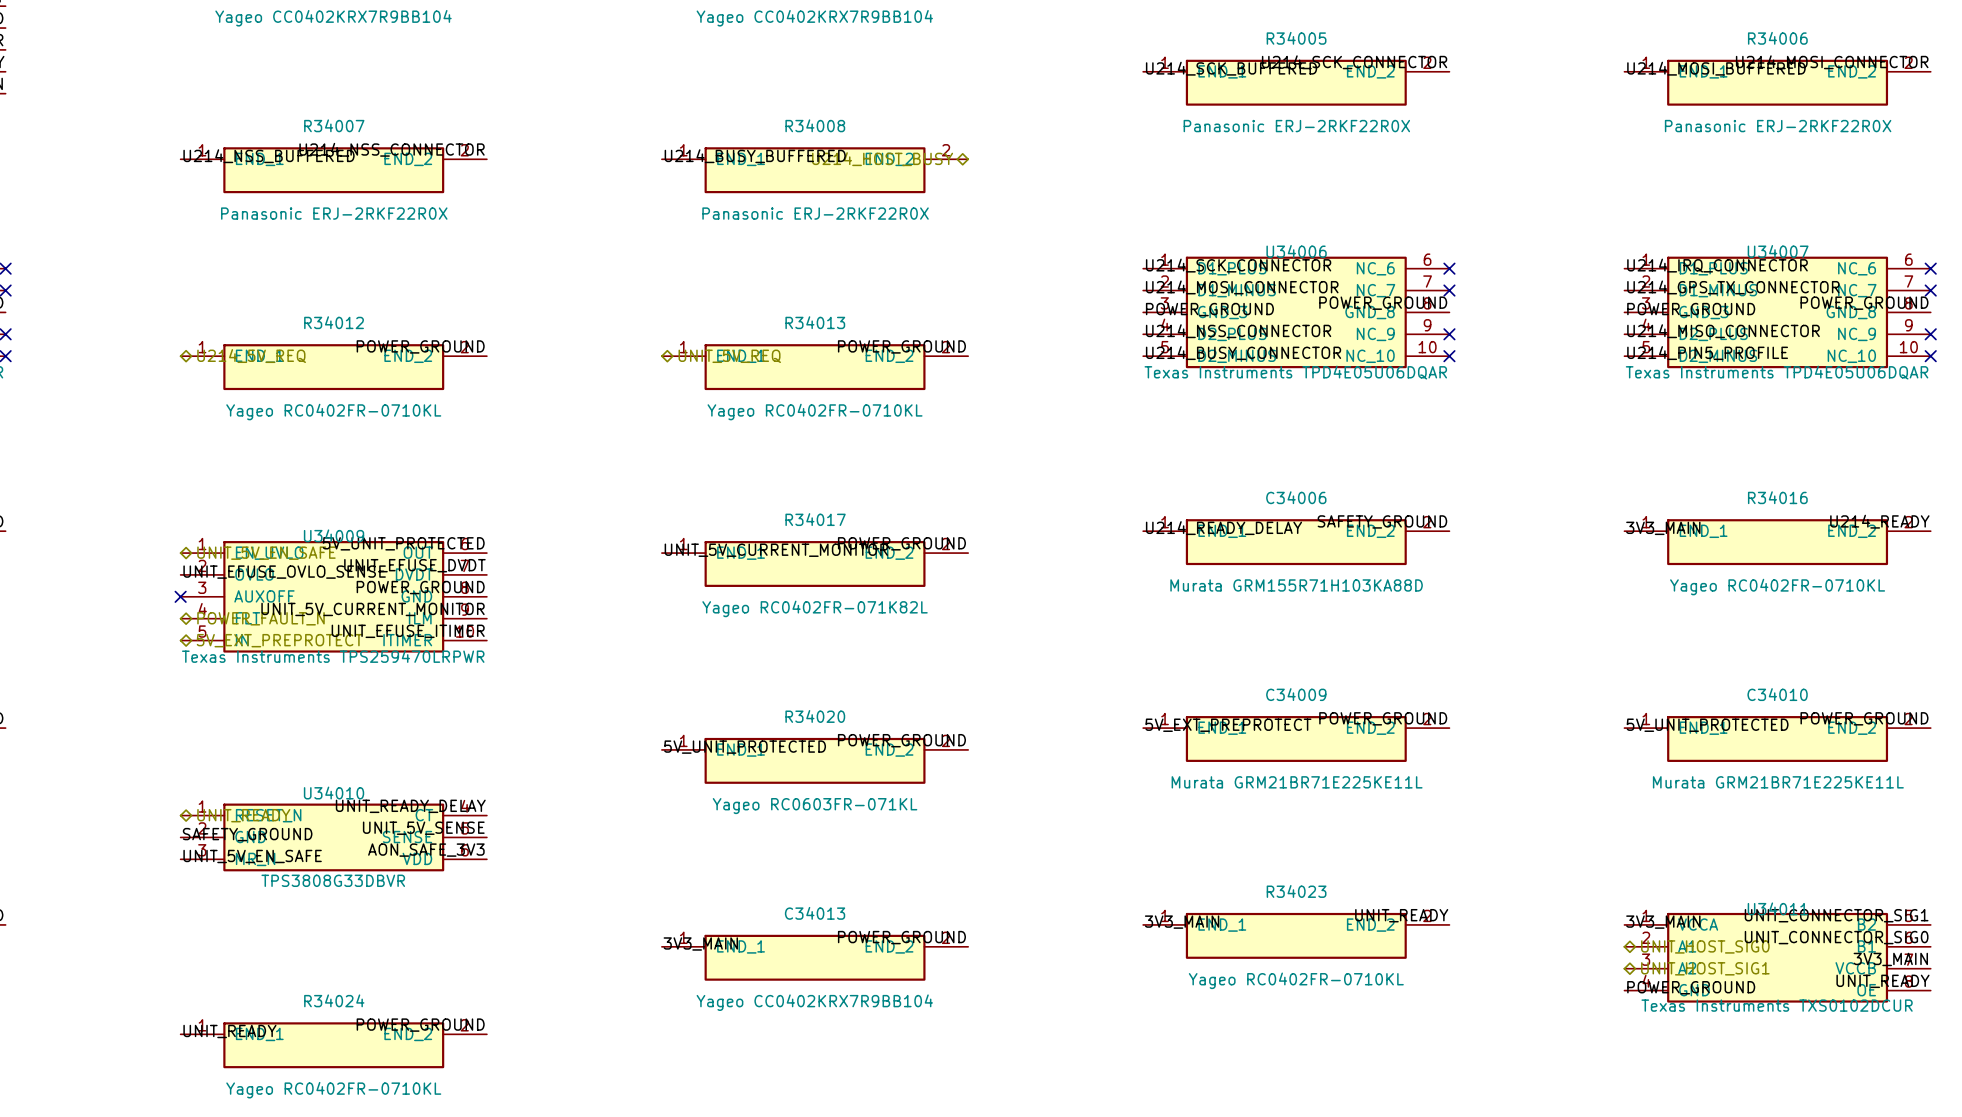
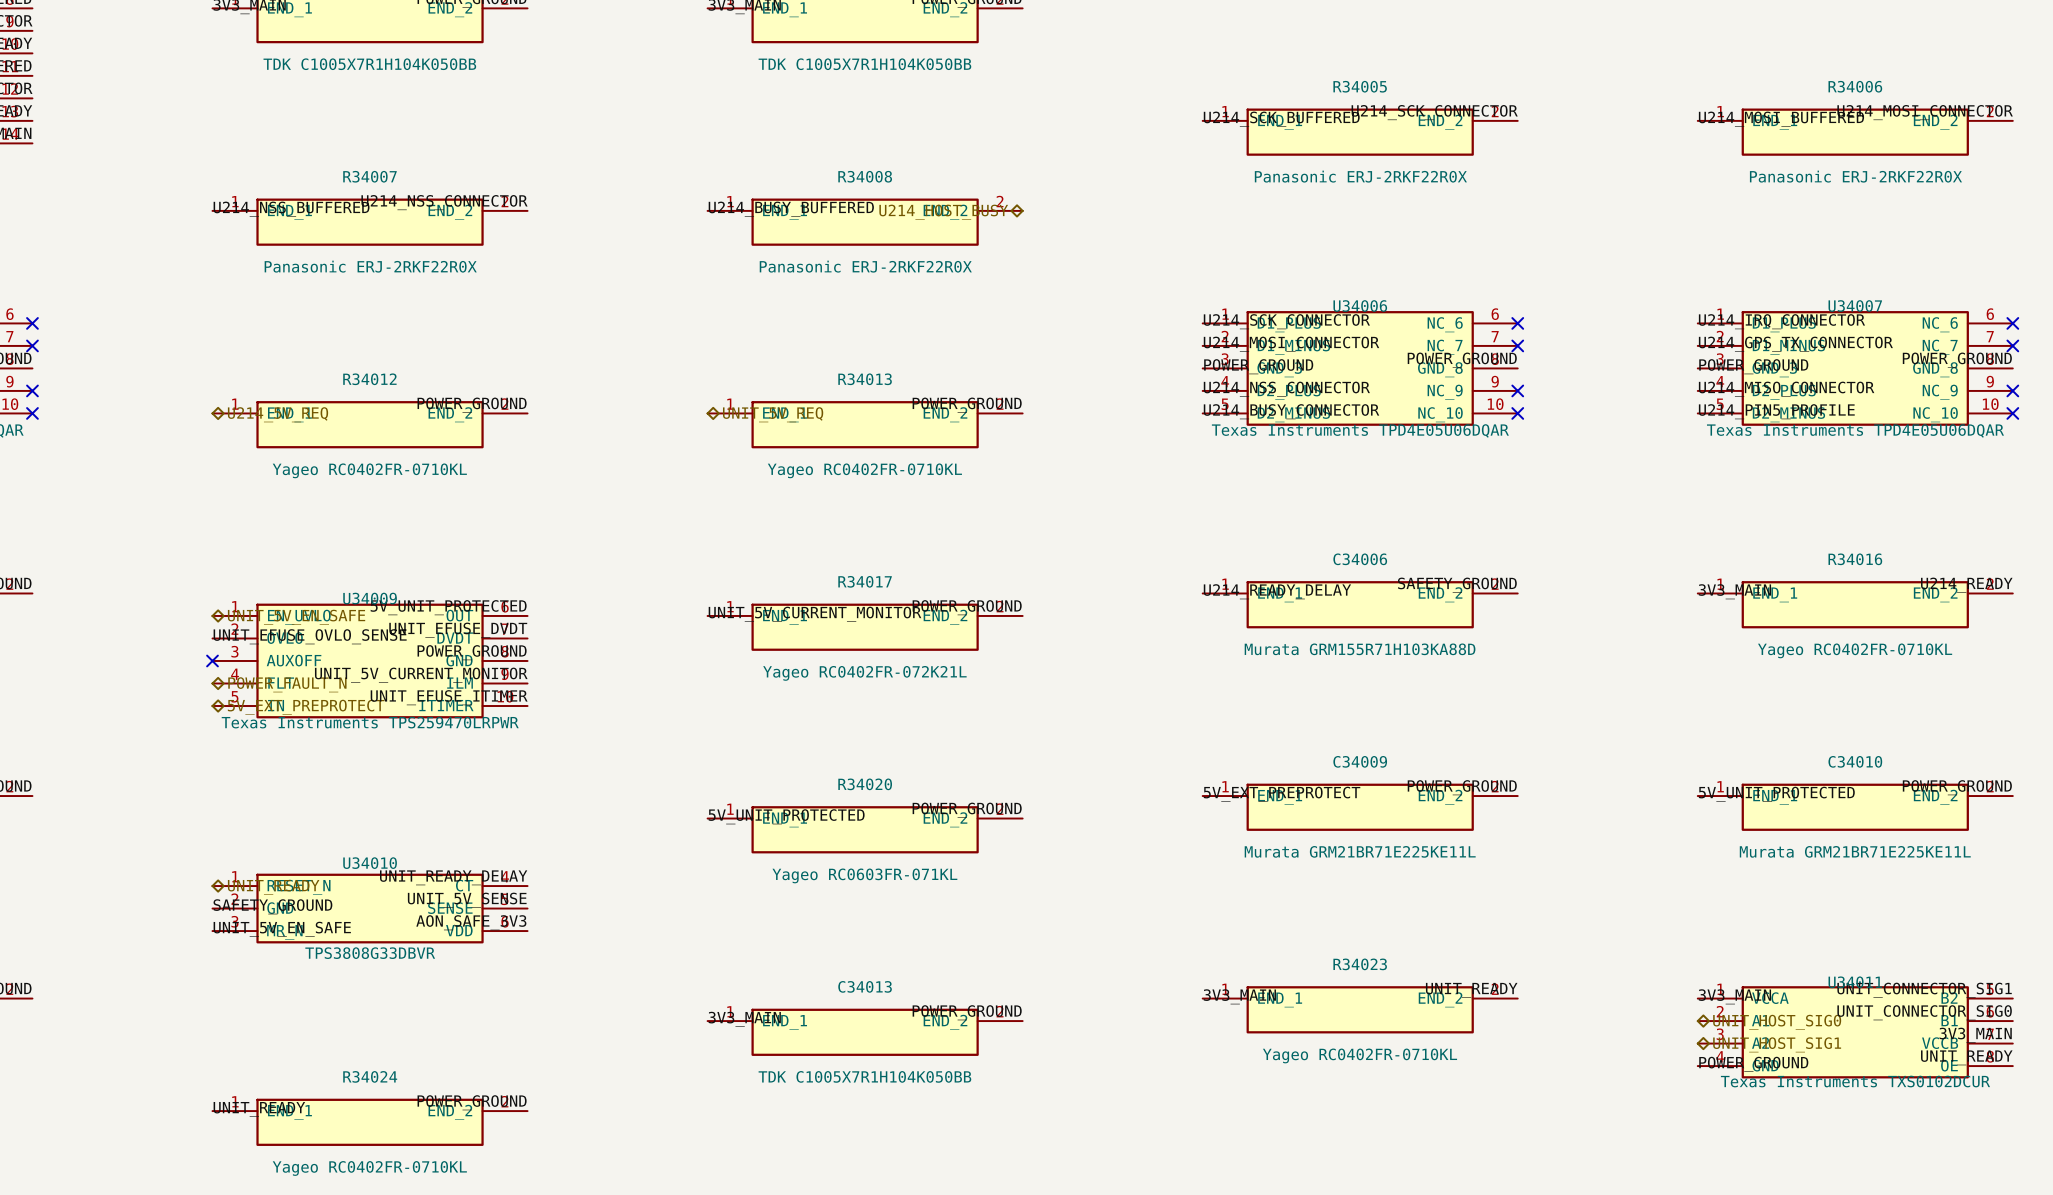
part value: Yageo CC0402KRX7R9BB104 (333, 18) -> TDK C1005X7R1H104K050BB (369, 64)
part value: Yageo CC0402KRX7R9BB104 (814, 18) -> TDK C1005X7R1H104K050BB (864, 64)
R34017 value: Yageo RC0402FR-071K82L (815, 608) -> Yageo RC0402FR-072K21L (864, 673)
C34013 value: Yageo CC0402KRX7R9BB104 (814, 1002) -> TDK C1005X7R1H104K050BB (864, 1076)

